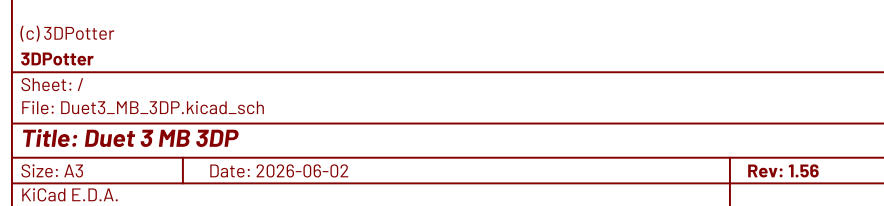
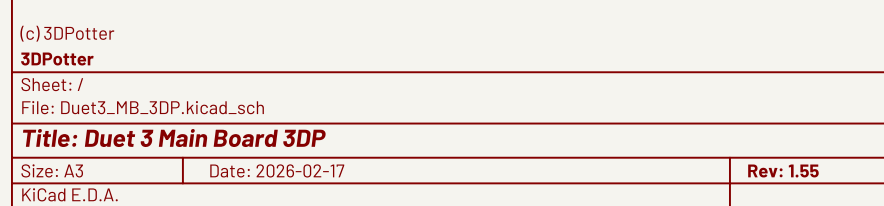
title block: Title: Duet 3 MB 3DP (130, 138) -> Title: Duet 3 Main Board 3DP (174, 138)
title block: Date: 2026-06-02 (279, 170) -> Date: 2026-02-17 (277, 170)
title block: Rev: 1.56 (783, 170) -> Rev: 1.55 (783, 170)

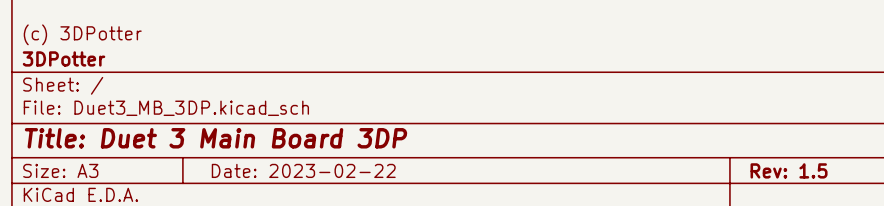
title block: Date: 2026-02-17 (277, 170) -> Date: 2023-02-22 (303, 170)
title block: Rev: 1.55 (783, 170) -> Rev: 1.5 (789, 170)

